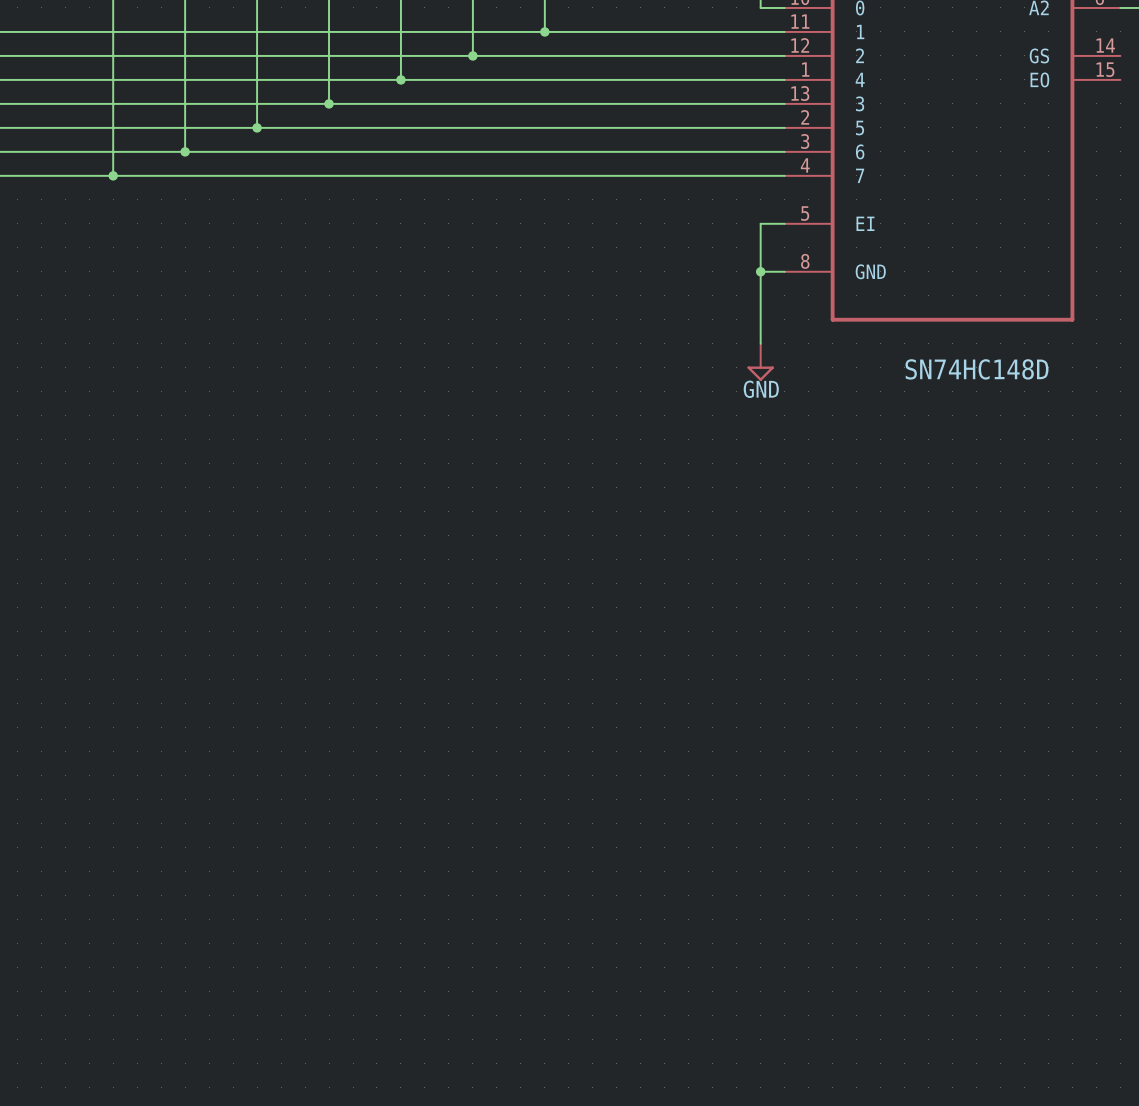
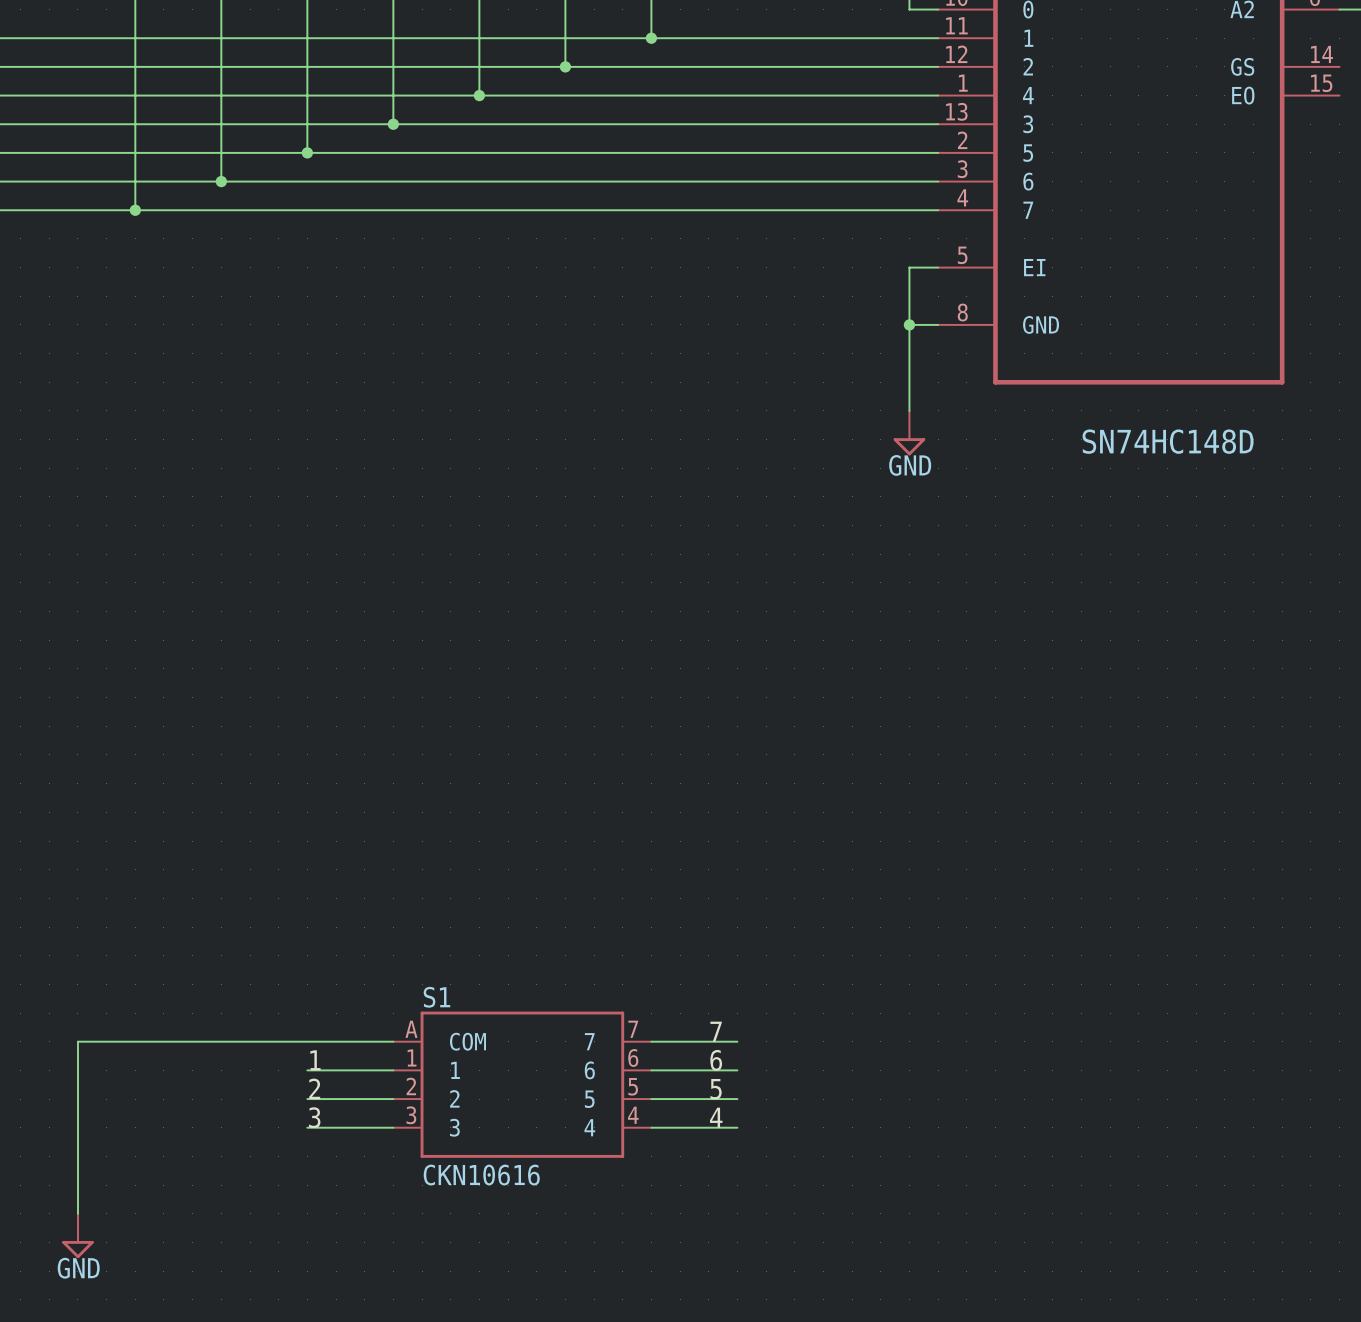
label: none -> 7 (716, 1031)
wire: none -> (393, 1041) (77, 1041) (77, 1213)
wire: none -> (651, 1041) (737, 1041)
label: none -> 1 (315, 1060)
label: none -> 6 (716, 1060)
wire: none -> (307, 1070) (393, 1070)
wire: none -> (651, 1070) (737, 1070)
S1: none -> CKN10616 (522, 1084)
label: none -> 2 (314, 1088)
label: none -> 5 (716, 1089)
wire: none -> (307, 1099) (393, 1099)
wire: none -> (651, 1099) (737, 1099)
label: none -> 3 (314, 1117)
label: none -> 4 (716, 1117)
wire: none -> (307, 1127) (393, 1127)
wire: none -> (651, 1127) (737, 1127)
power symbol: none -> GND (77, 1235)

